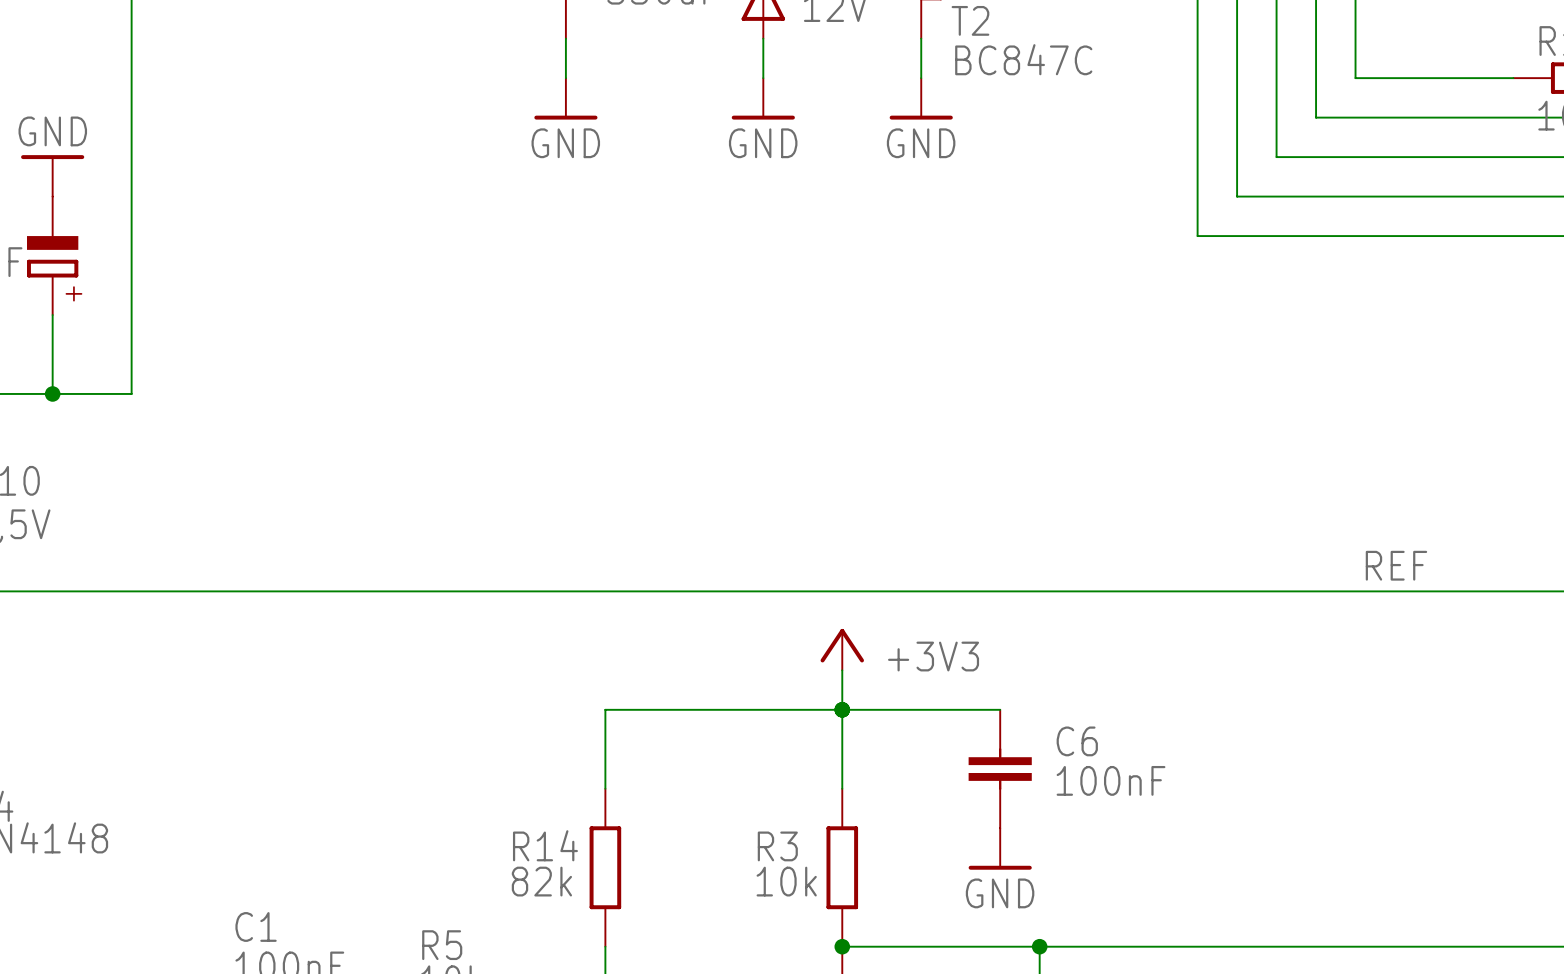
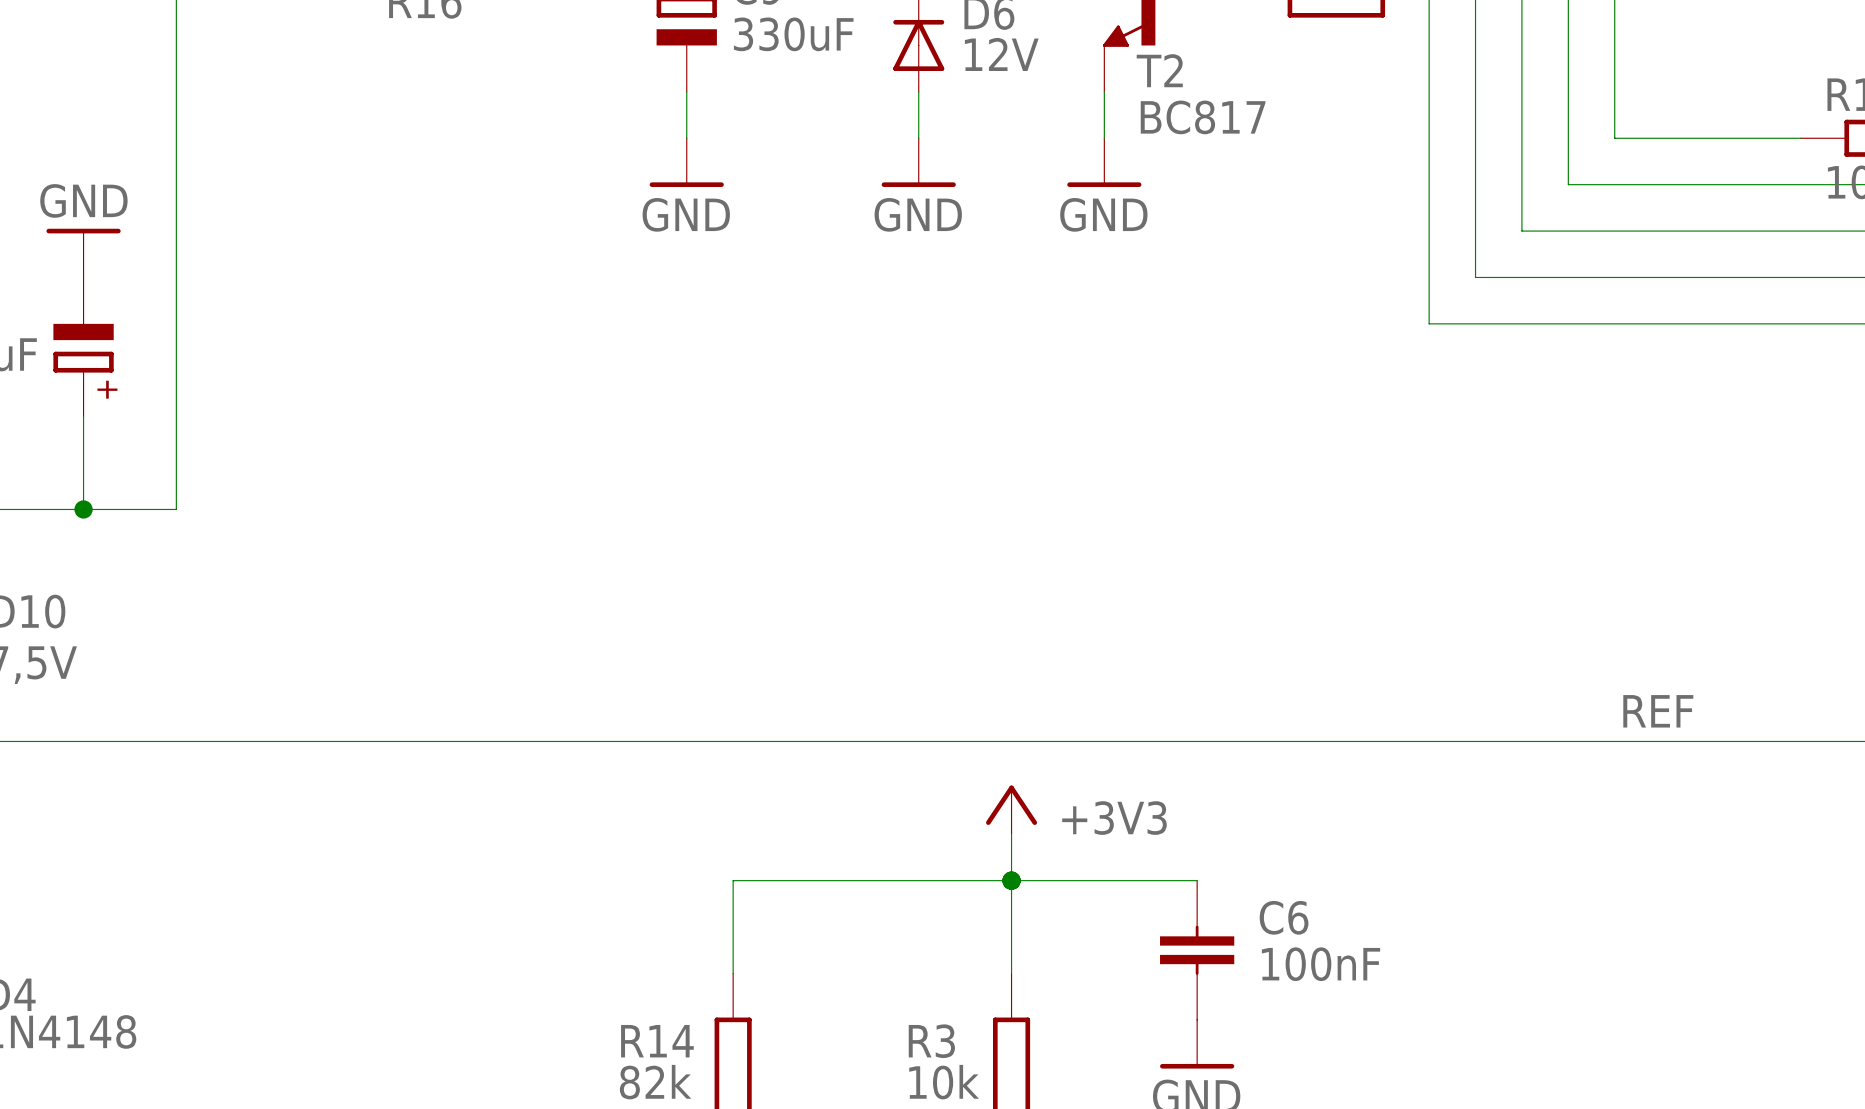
T2 value: BC847C (1023, 59) -> BC817 (1203, 117)

